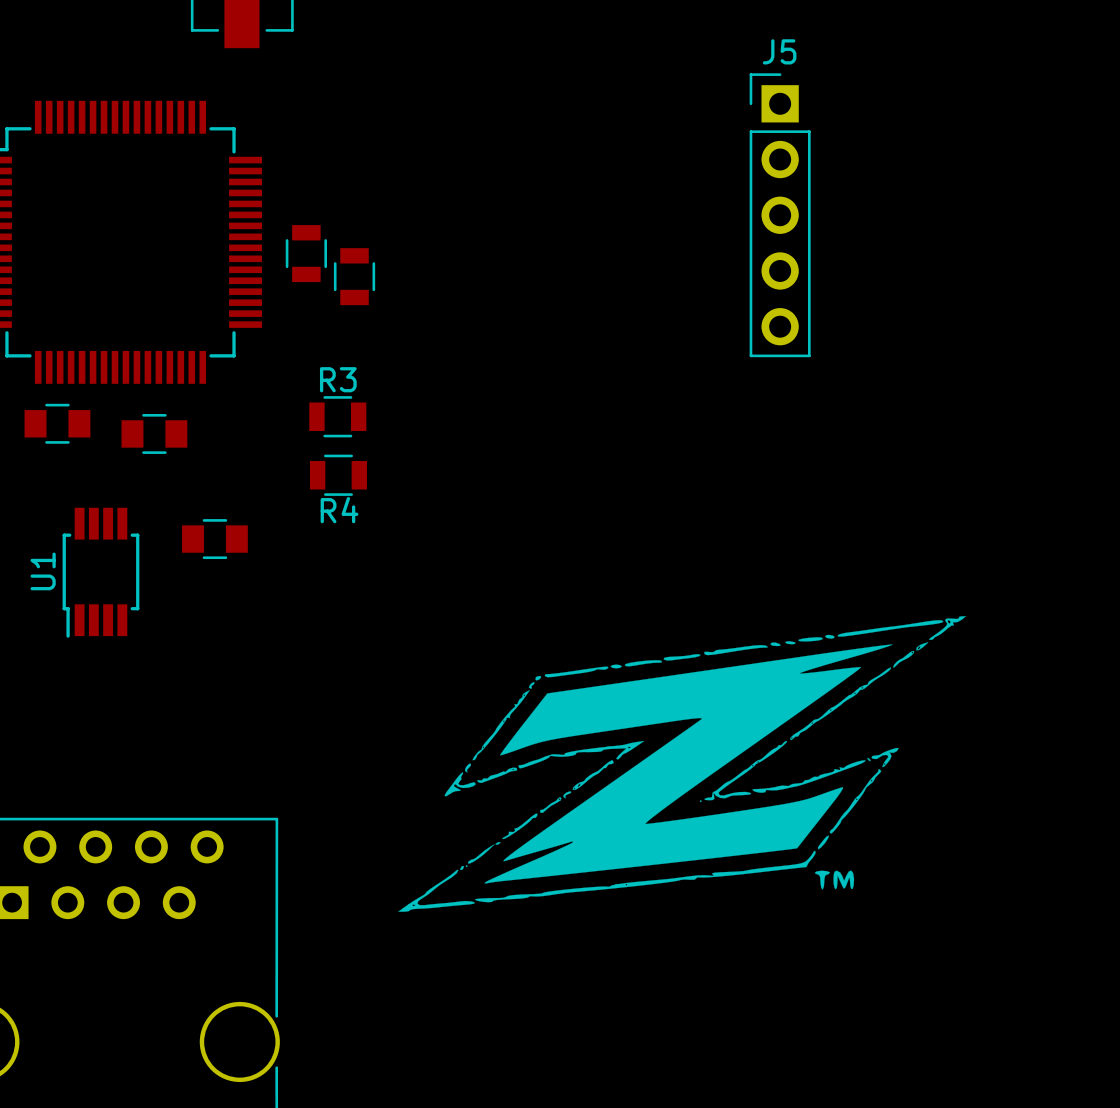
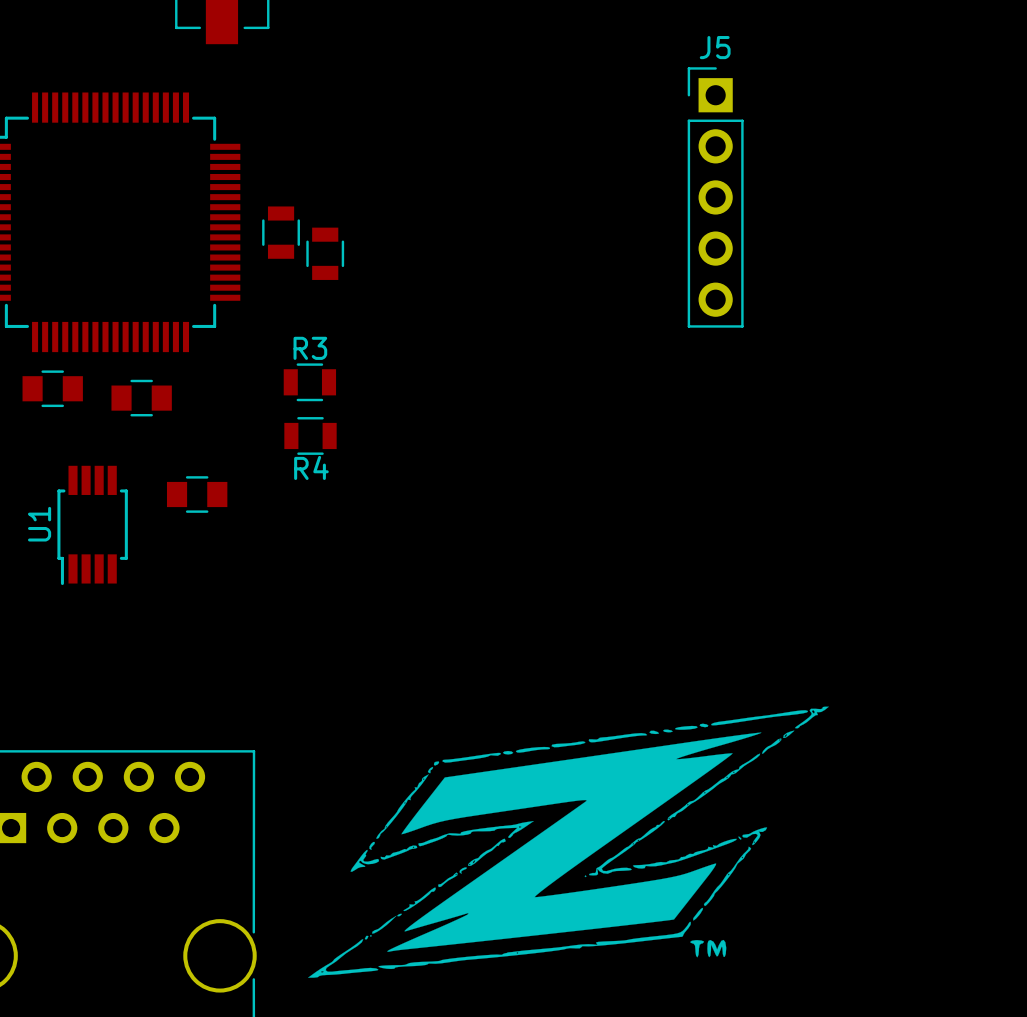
drawing position: (682, 764) -> (568, 842)

